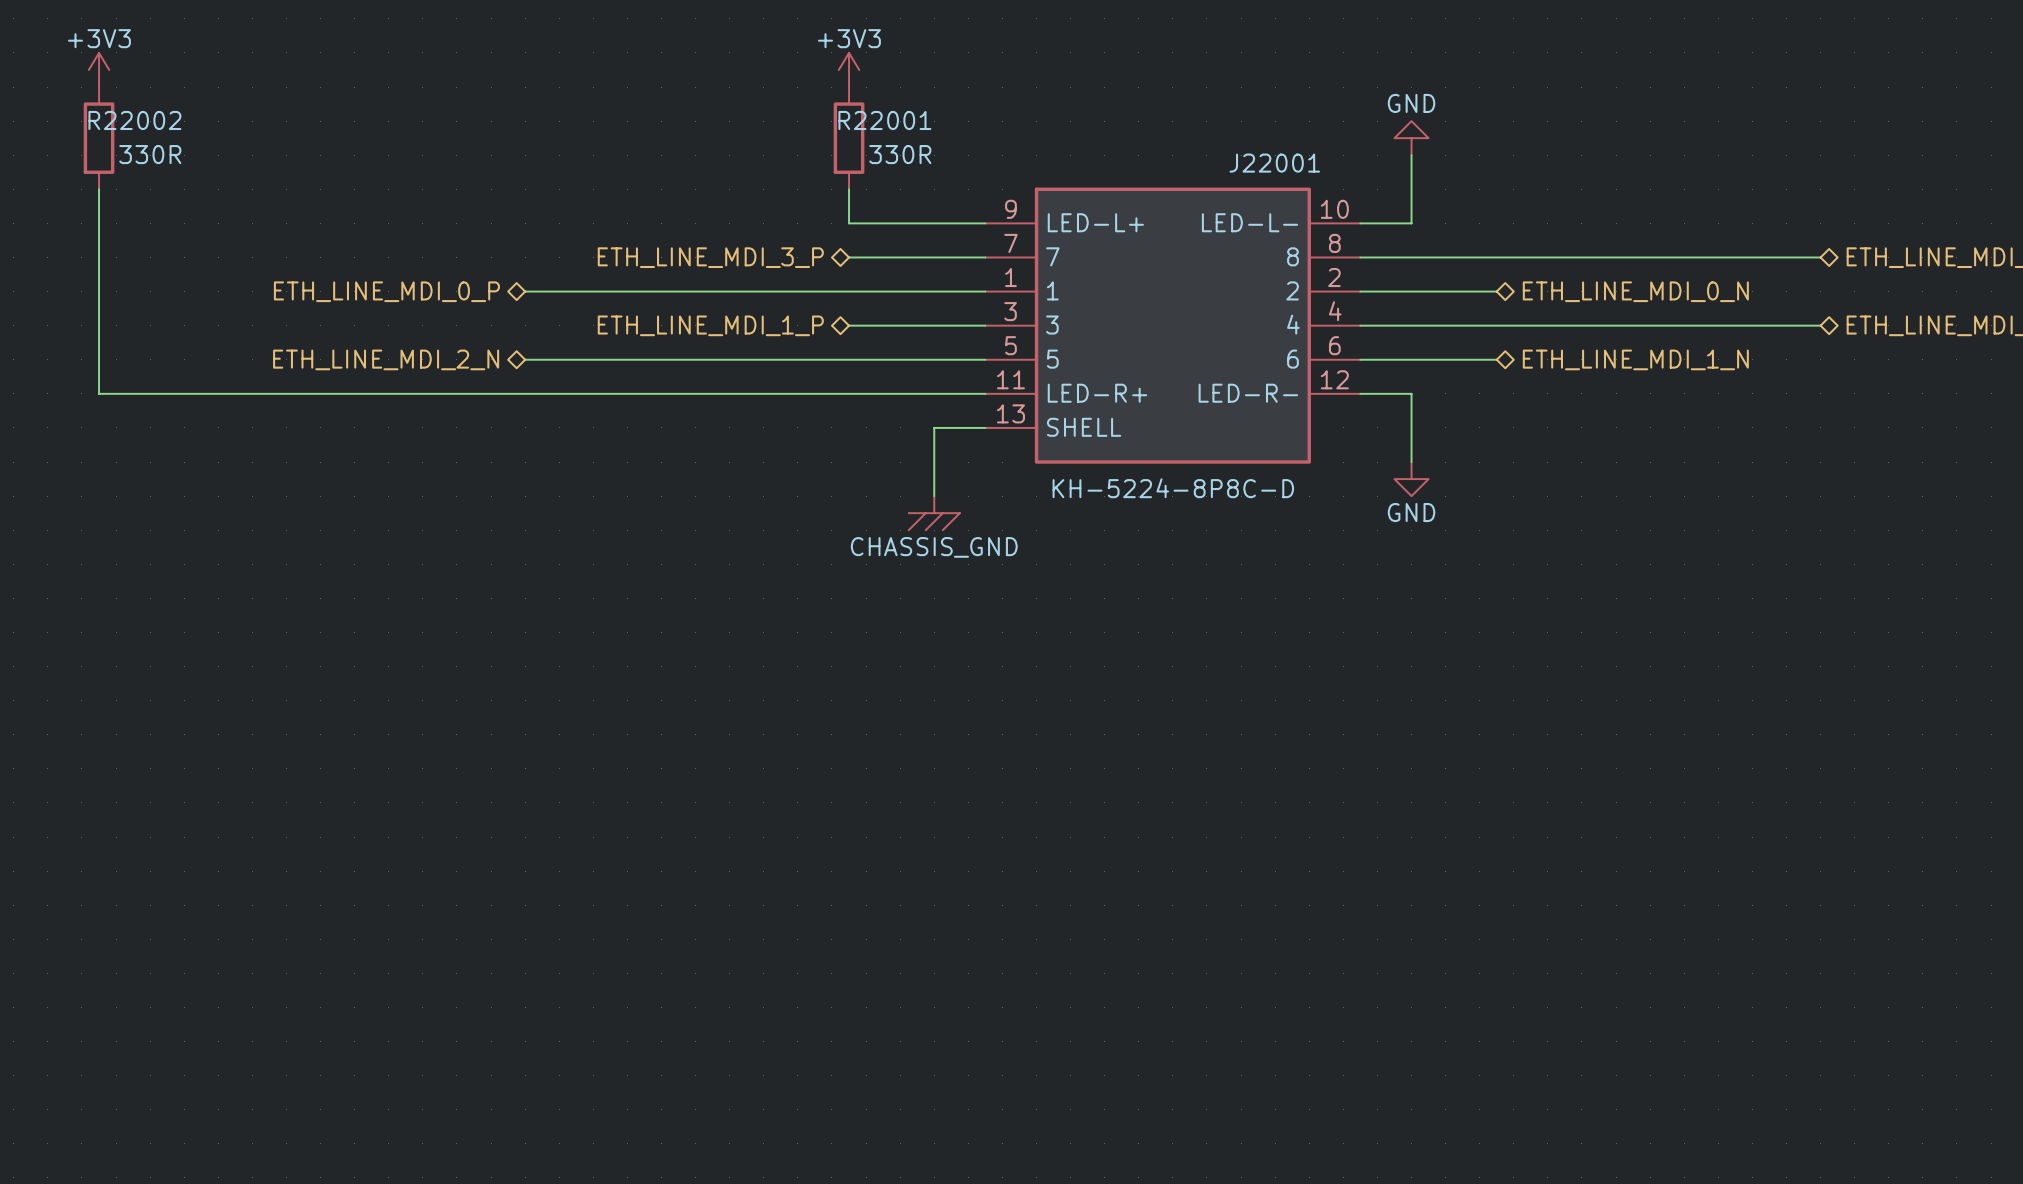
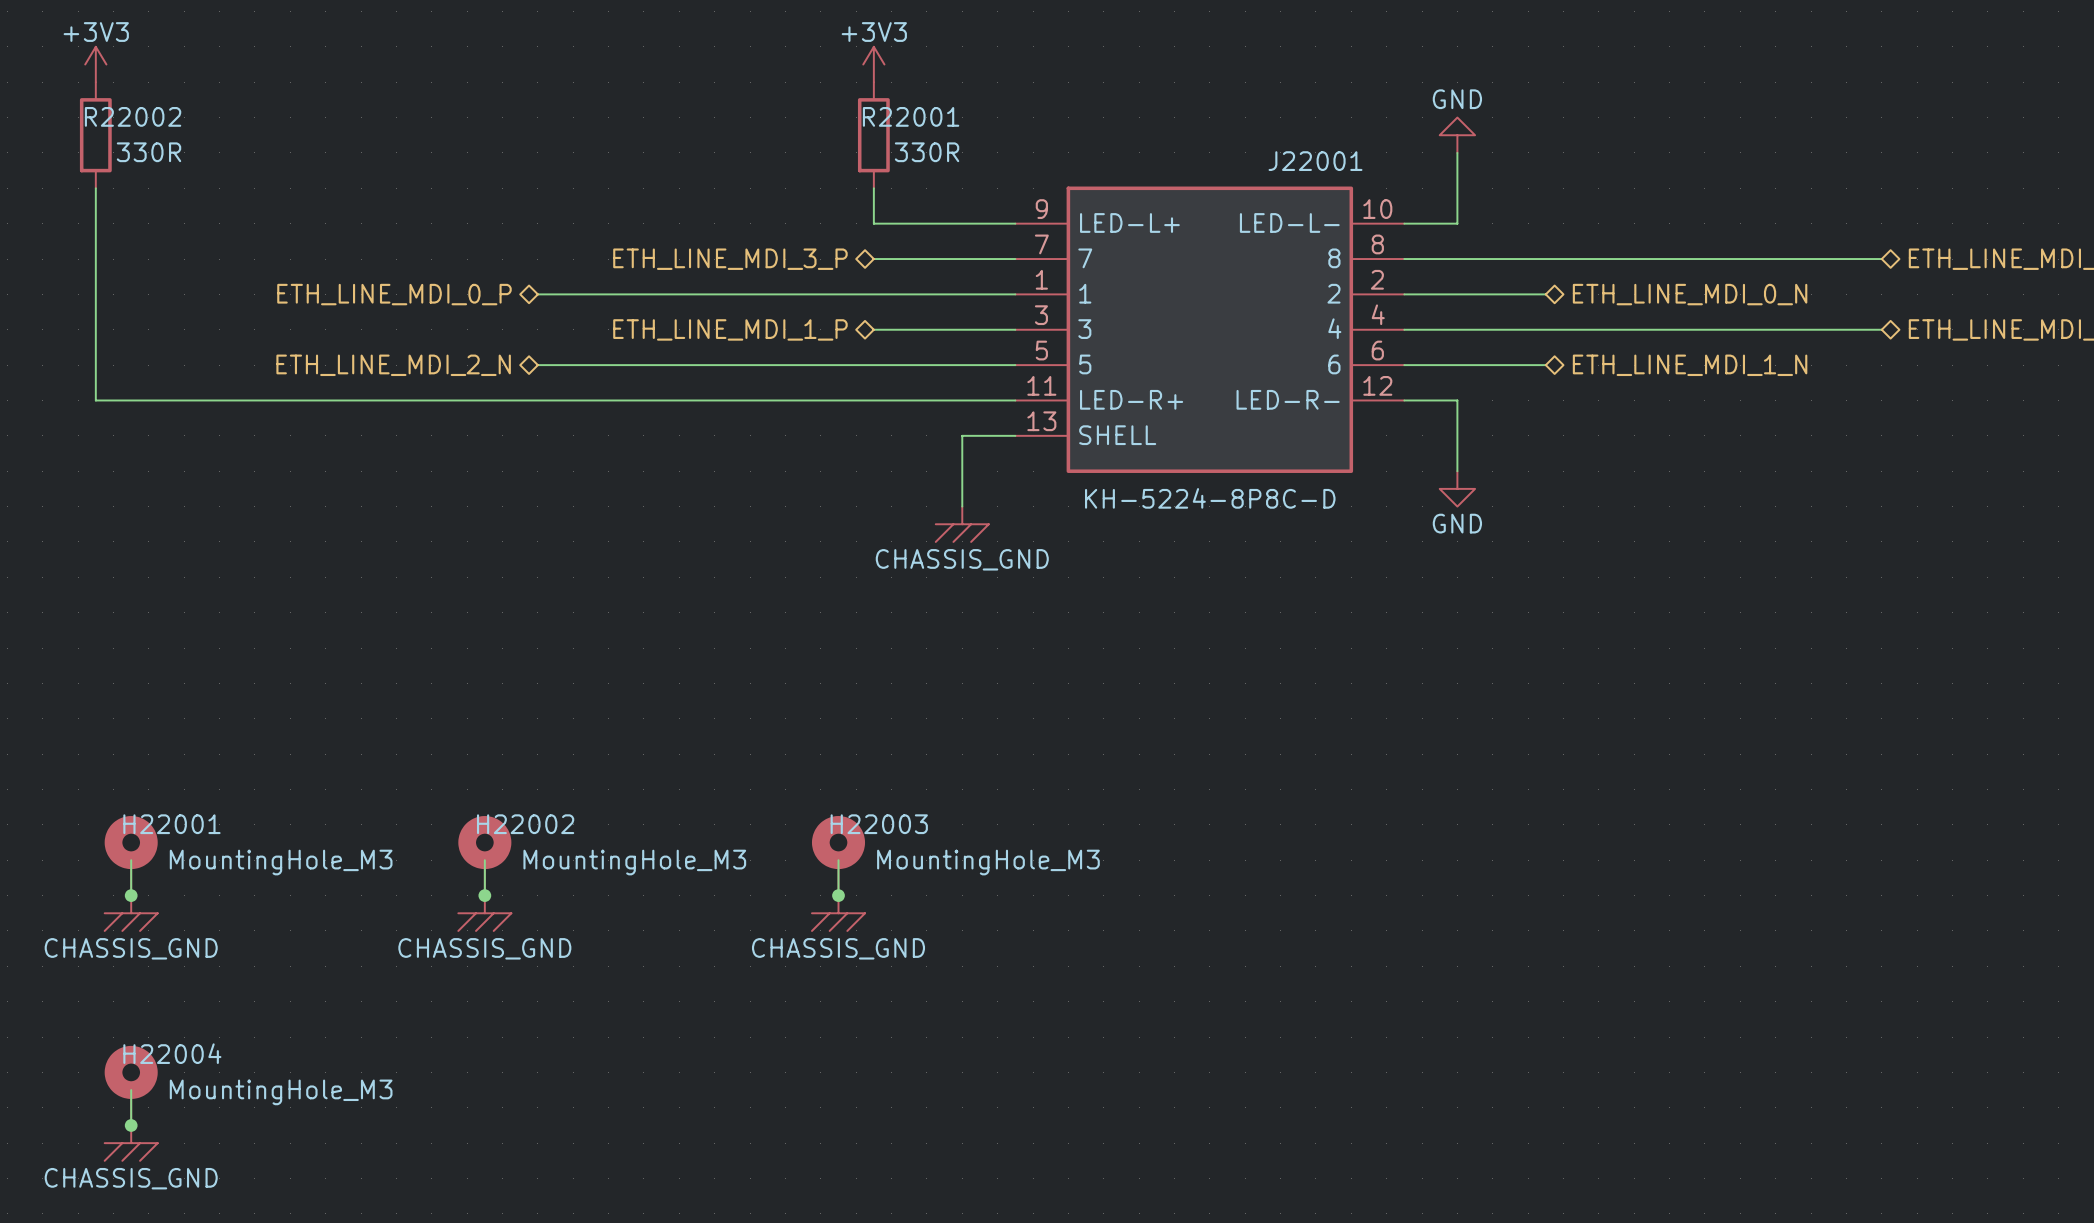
H22001: none -> MountingHole_M3 (131, 855)
H22002: none -> MountingHole_M3 (484, 855)
H22003: none -> MountingHole_M3 (838, 855)
wire: none -> (131, 860) (131, 895)
wire: none -> (484, 860) (484, 895)
wire: none -> (838, 860) (838, 895)
junction: none -> (131, 895)
junction: none -> (484, 895)
junction: none -> (838, 895)
power symbol: none -> CHASSIS_GND (131, 913)
power symbol: none -> CHASSIS_GND (484, 913)
power symbol: none -> CHASSIS_GND (838, 913)
H22004: none -> MountingHole_M3 (131, 1085)
wire: none -> (131, 1090) (131, 1125)
junction: none -> (131, 1125)
power symbol: none -> CHASSIS_GND (131, 1143)

